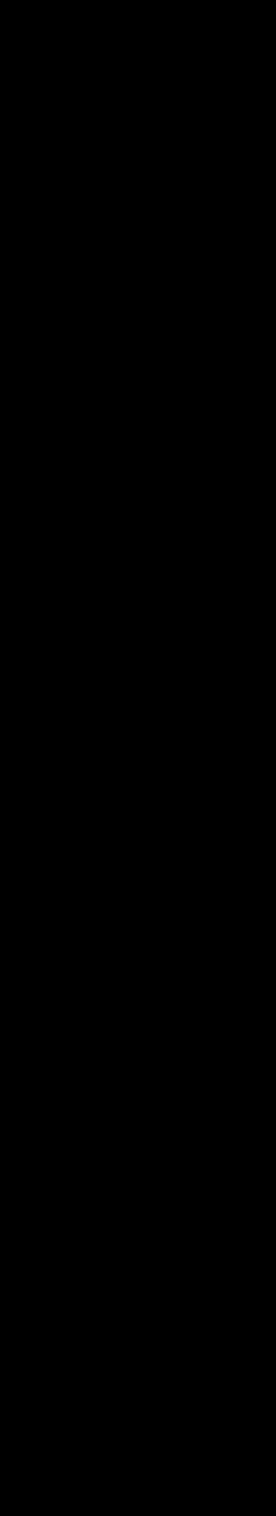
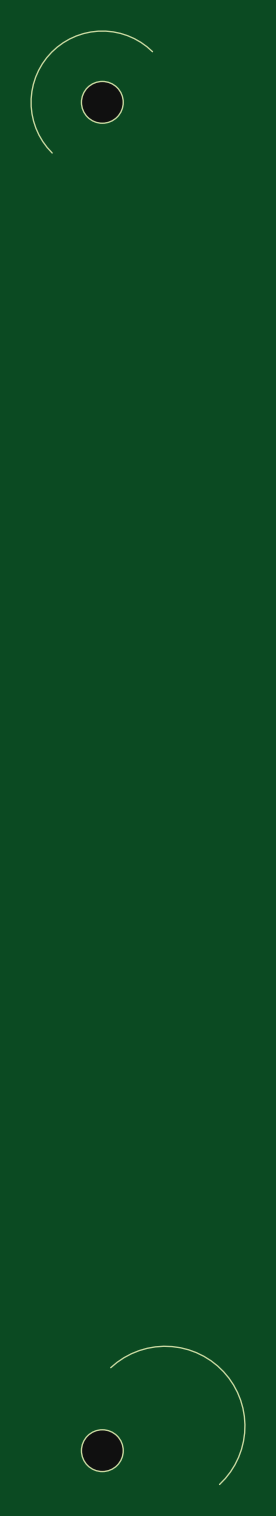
board edge: none -> (152, 51) (134, 38) (120, 33) (105, 31) (90, 31) (76, 35) (63, 42) (51, 52) (42, 63) (35, 77) (31, 91) (31, 106) (33, 121) (38, 135) (52, 153)
part: none -> (102, 102)
board edge: none -> (110, 1367) (131, 1353) (147, 1348) (163, 1346) (180, 1347) (196, 1352) (210, 1360) (223, 1371) (237, 1392) (242, 1408) (244, 1424) (243, 1441) (238, 1457) (230, 1471) (219, 1484)
part: none -> (102, 1450)

